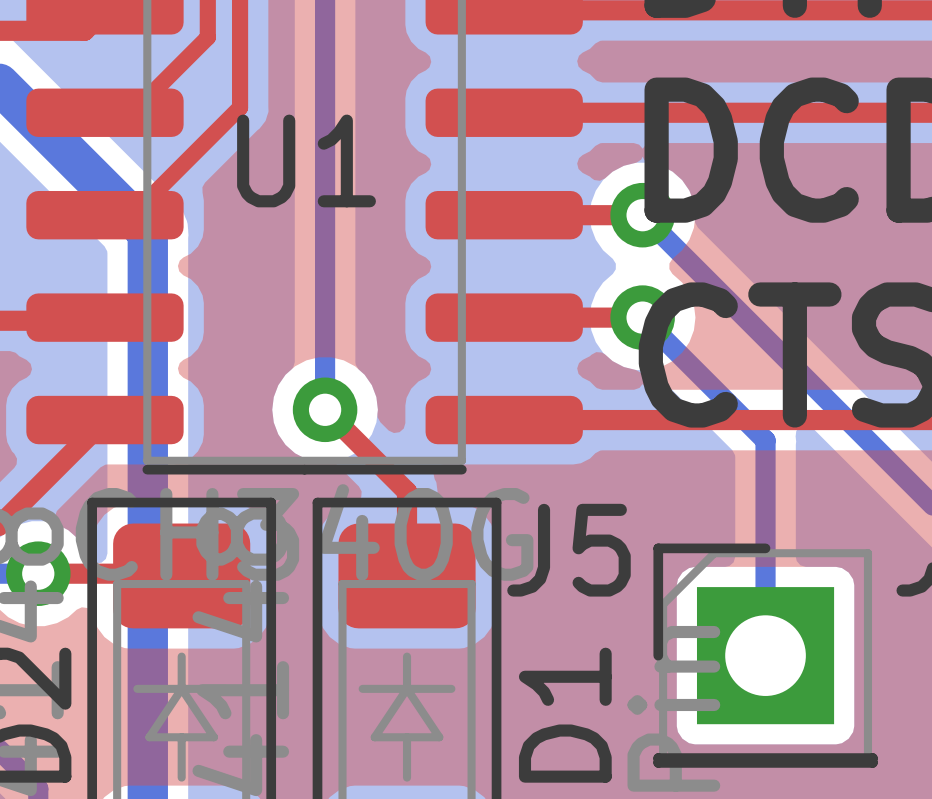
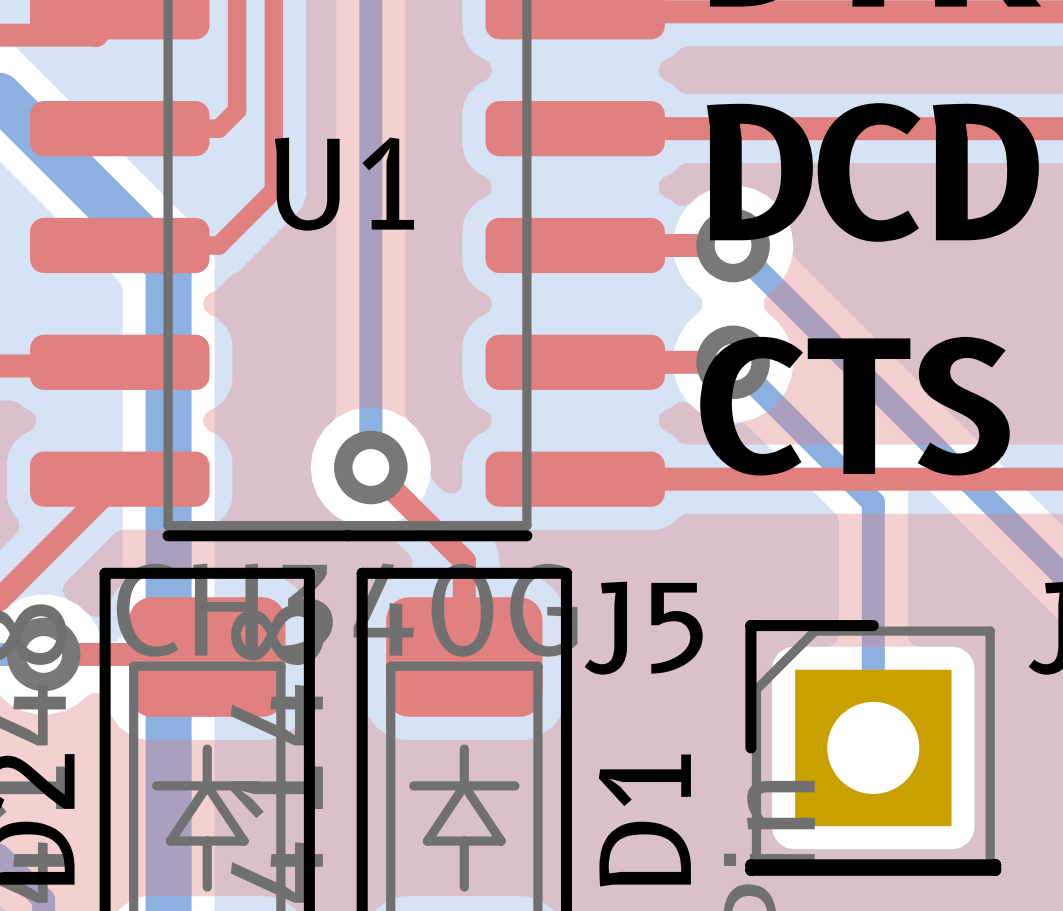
top track: (207, 37) (132, 112) -> (237, 42) (237, 110) (218, 128) (151, 128)
top track: (240, 107) (132, 215) -> (273, 122) (273, 190) (218, 245) (151, 245)

